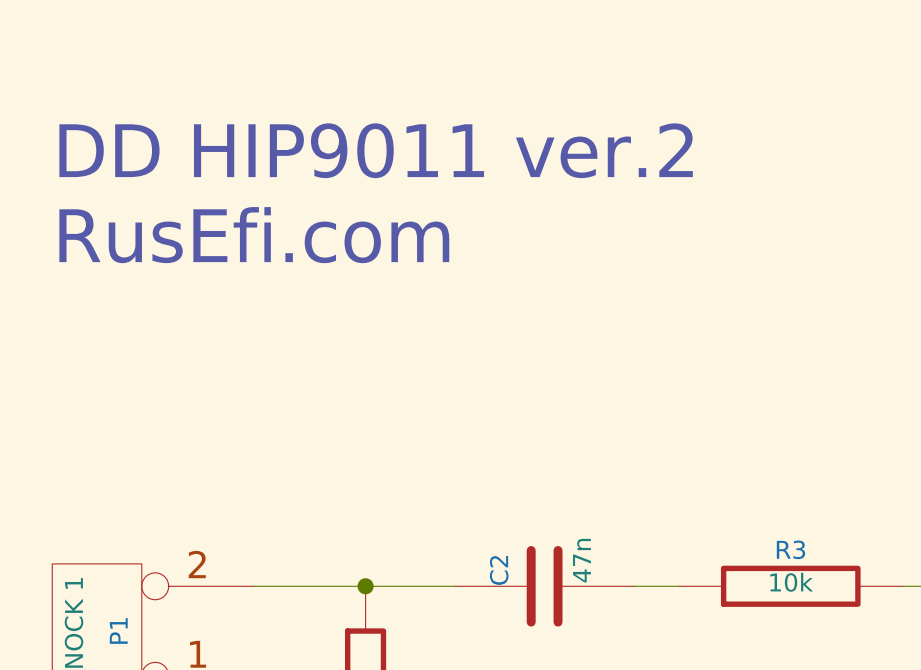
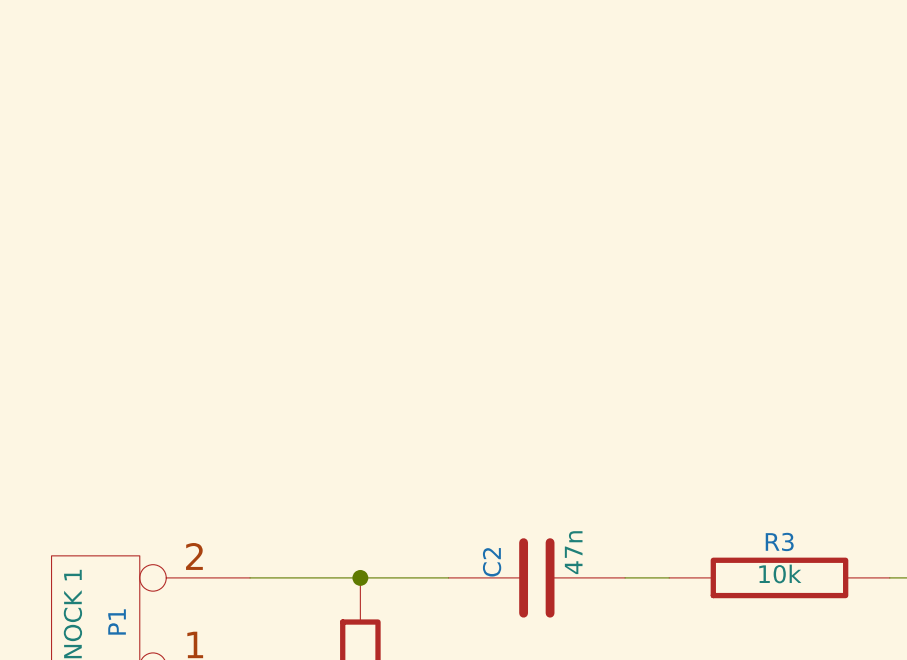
text: DD HIP9011 ver.2 (376, 150) -> none
text: RusEfi.com (254, 235) -> none

